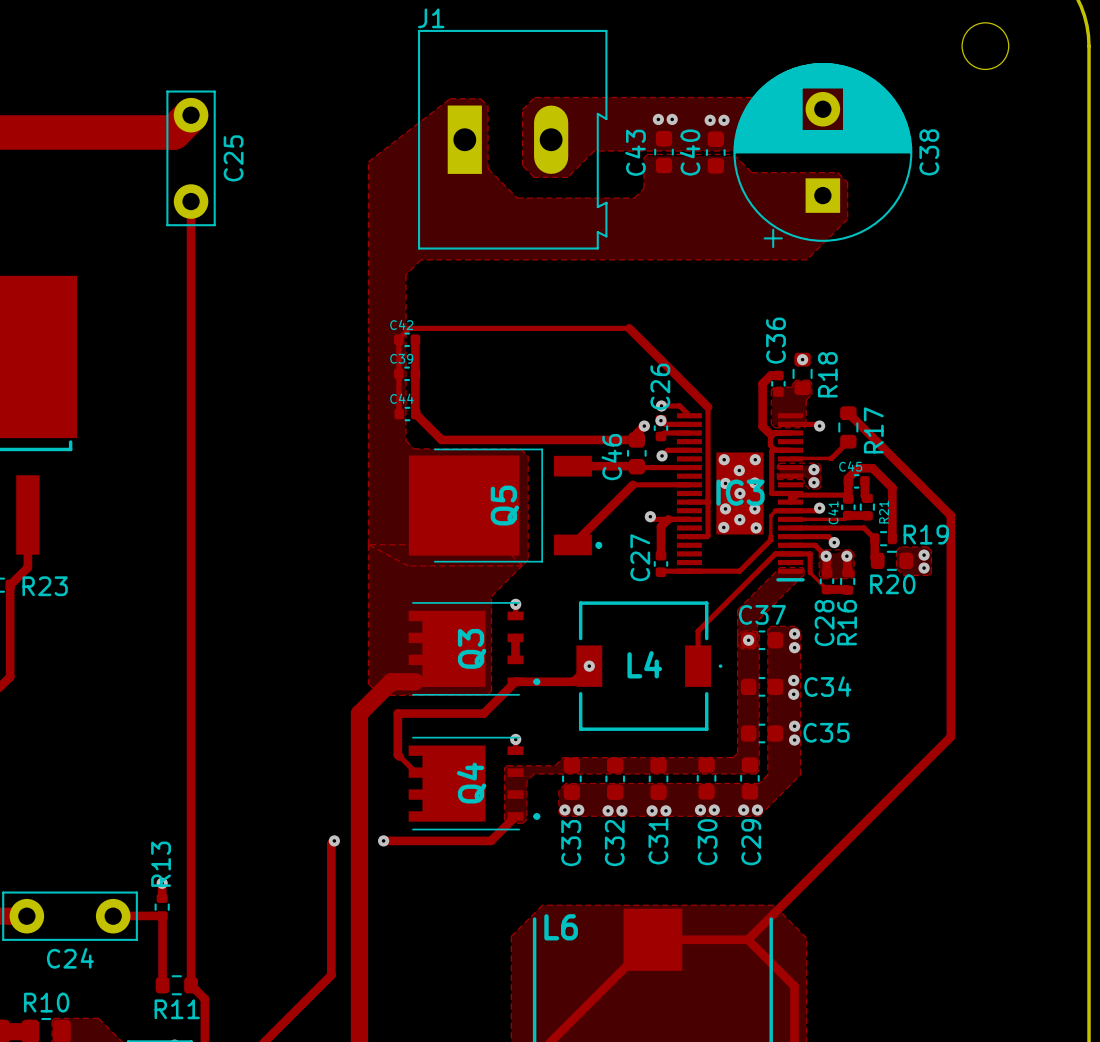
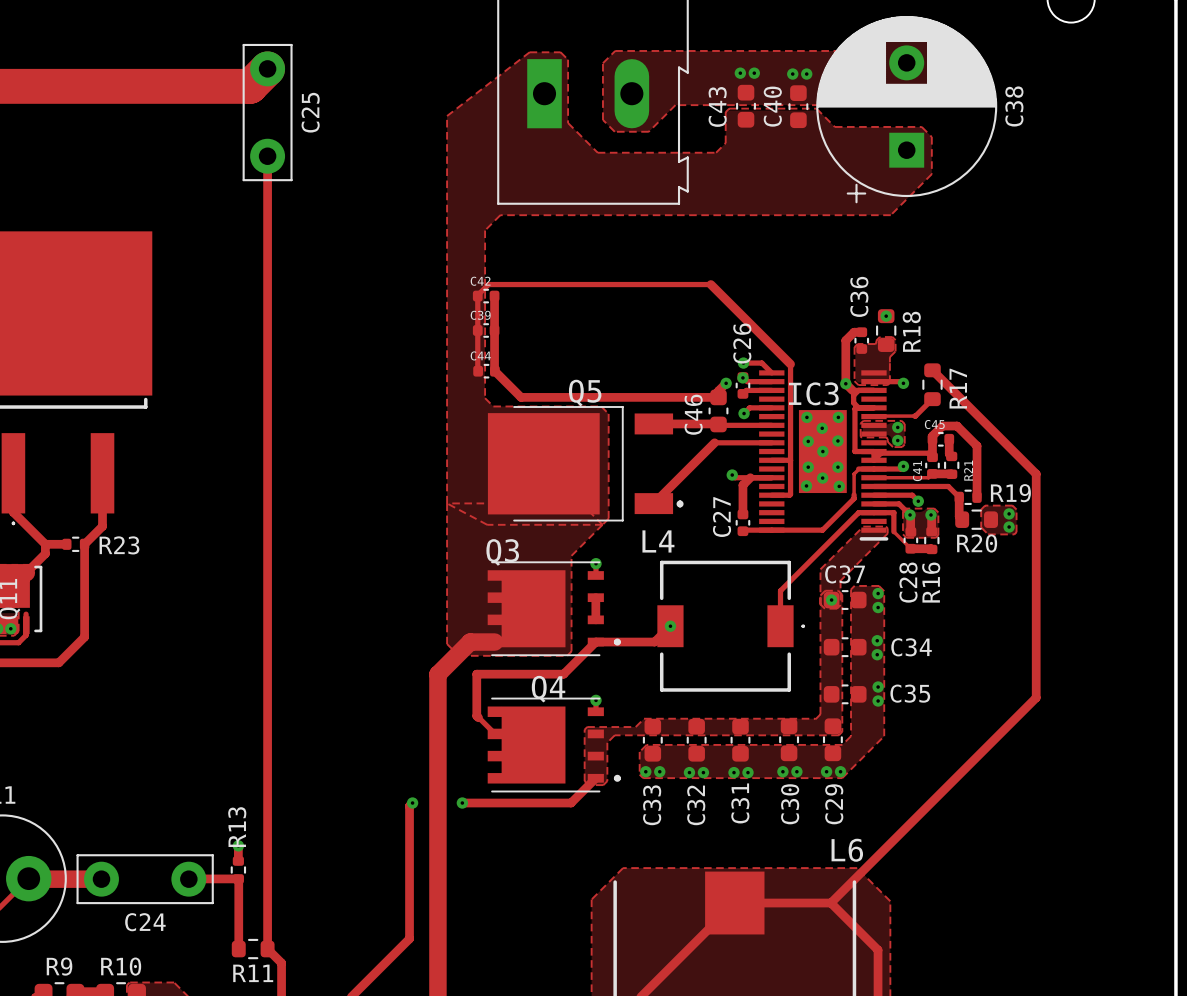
via: none -> (845, 383)
IC3 name position: IC3 (740, 492) -> IC3 (813, 393)
Q5 name rotation: 0° (504, 505) -> 90° clockwise (585, 393)
Q5 name position: Q5 (504, 505) -> Q5 (585, 393)
Q3 name rotation: 0° (472, 648) -> 90° clockwise (502, 552)
Q3 name position: Q3 (472, 648) -> Q3 (502, 552)
L4 name position: L4 (644, 664) -> L4 (658, 541)
Q4 name rotation: 0° (471, 783) -> 90° clockwise (548, 689)
L6 name position: L6 (561, 927) -> L6 (847, 850)

